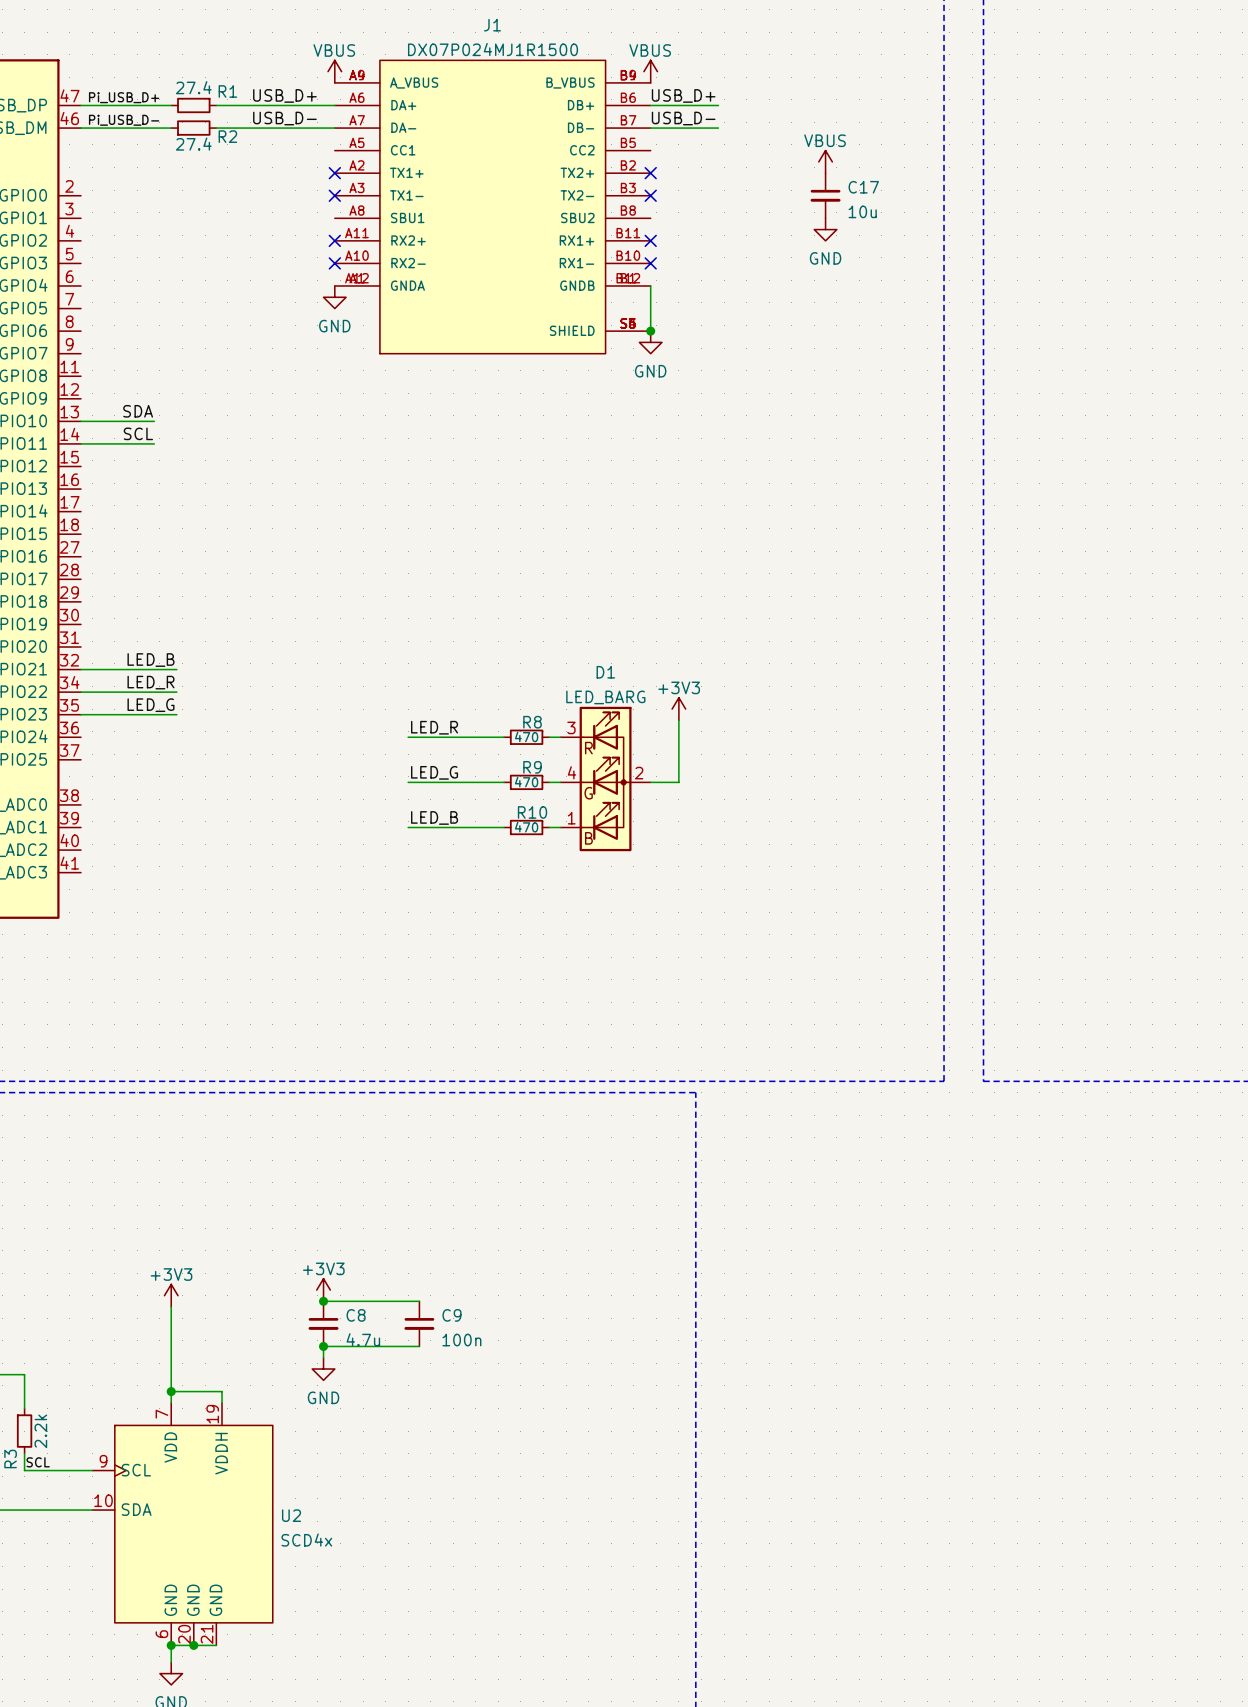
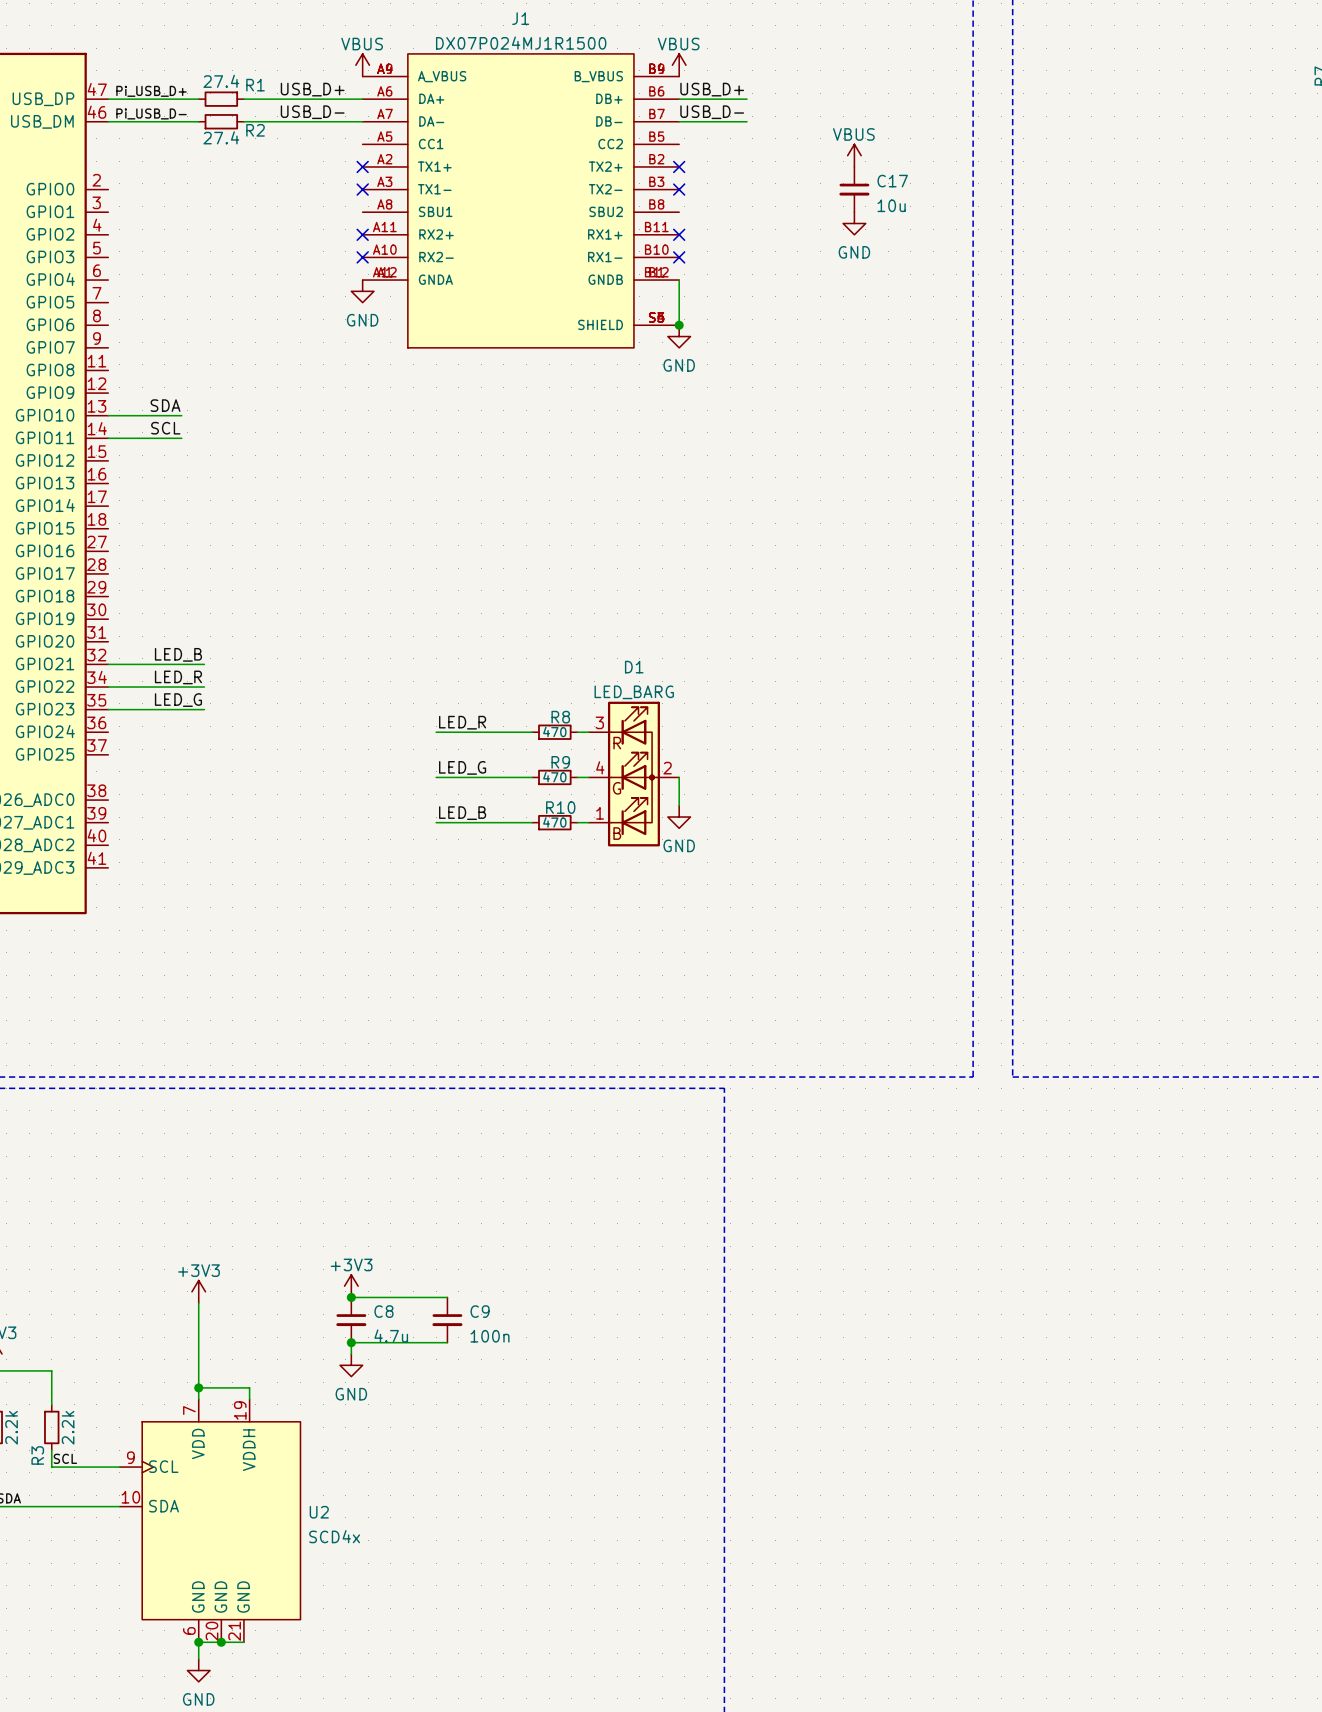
power symbol: +3V3 (678, 709) -> none
wire: (678, 720) (678, 782) (650, 782) -> (679, 805) (679, 777)
power symbol: none -> GND (679, 817)

